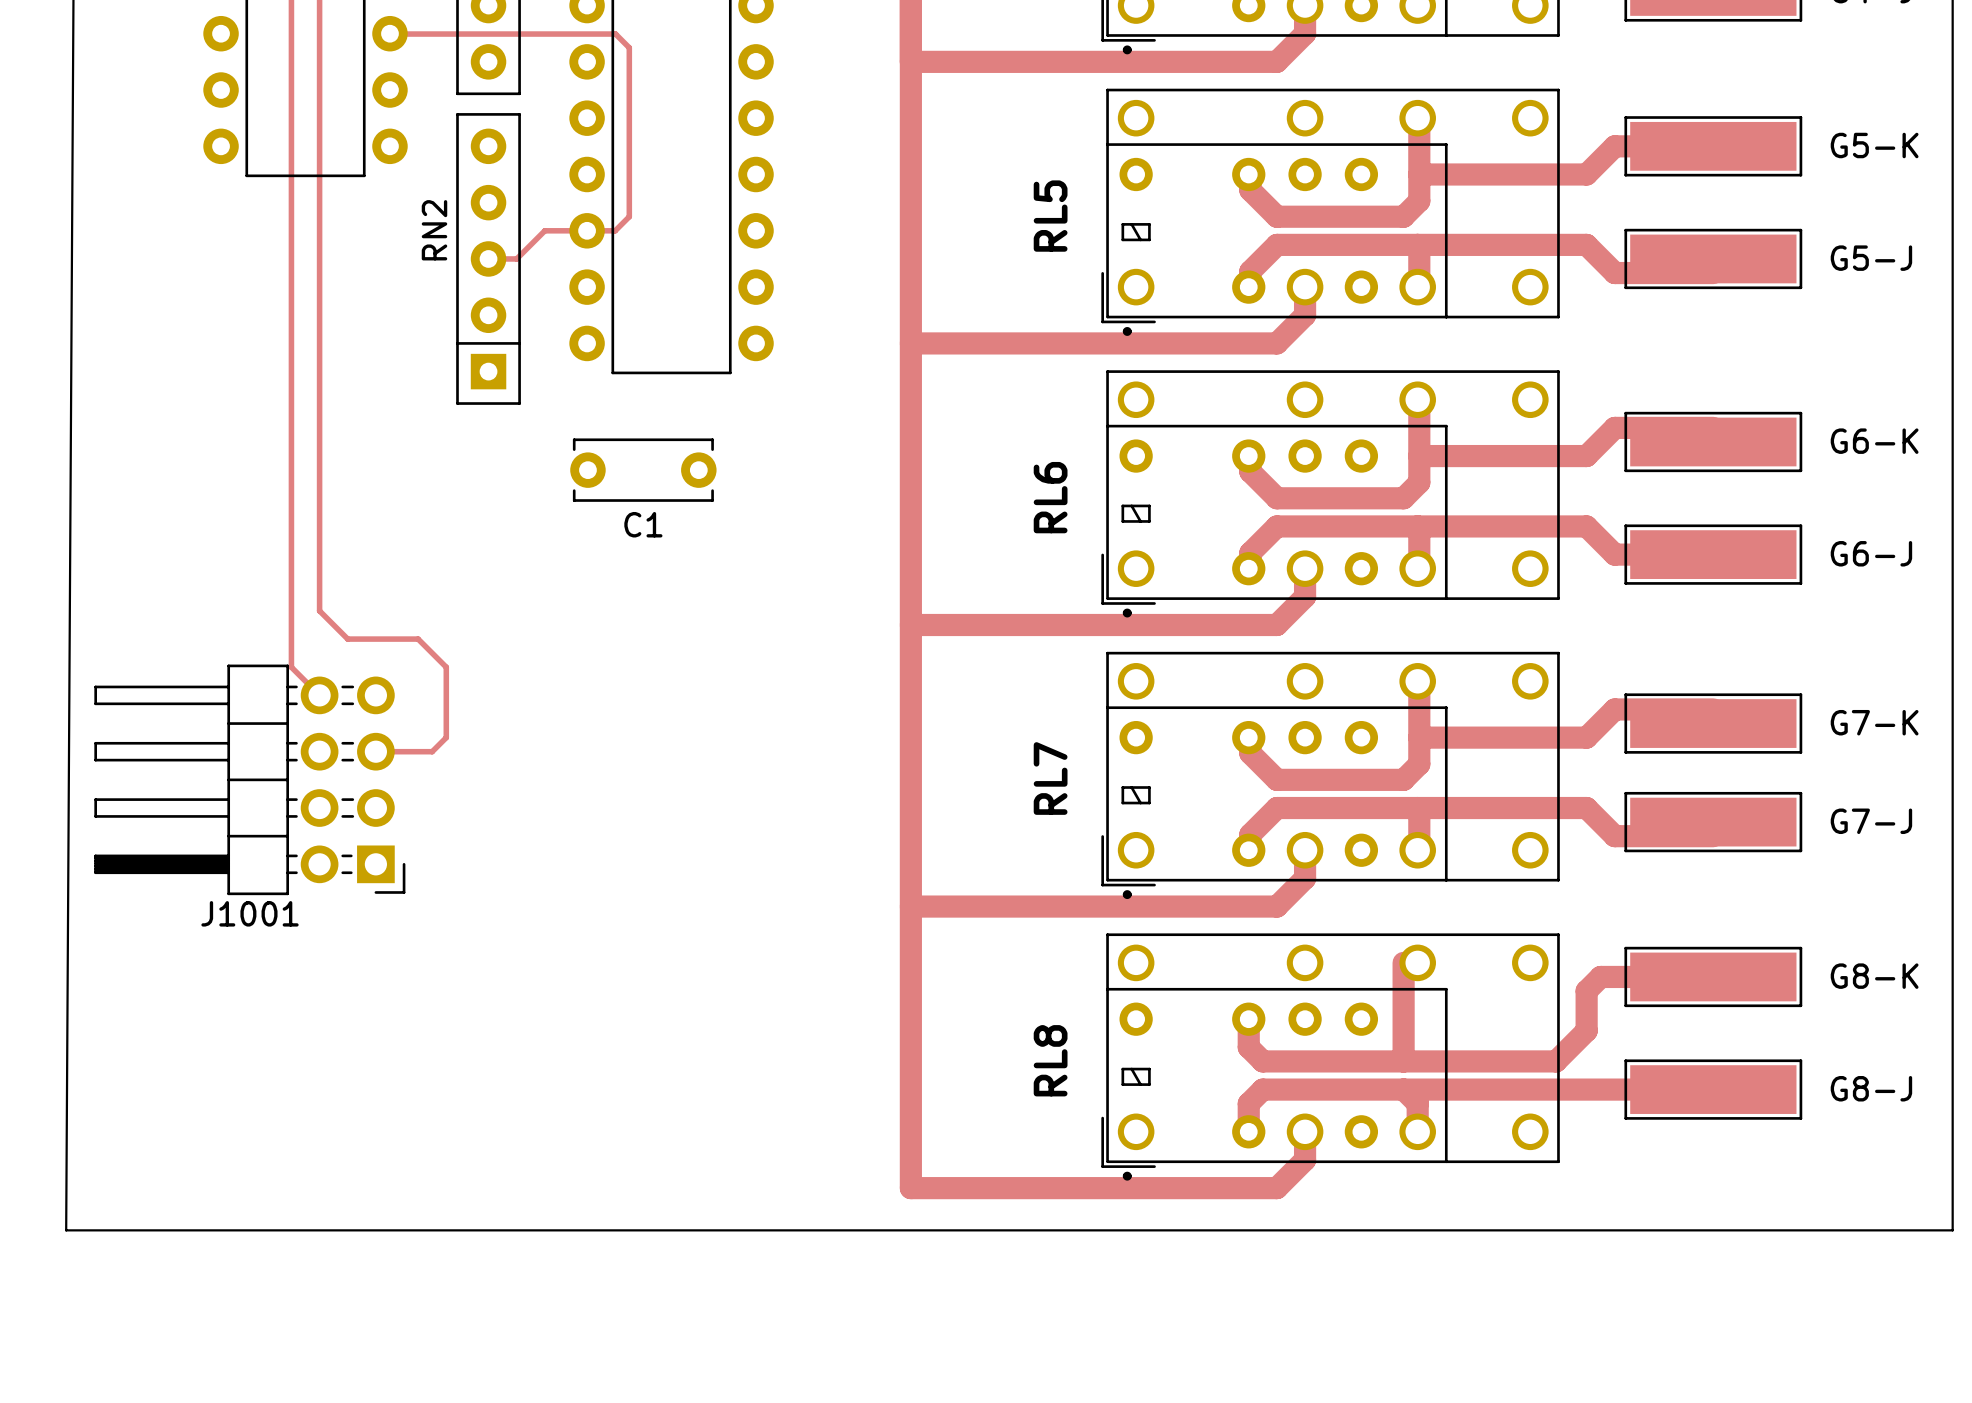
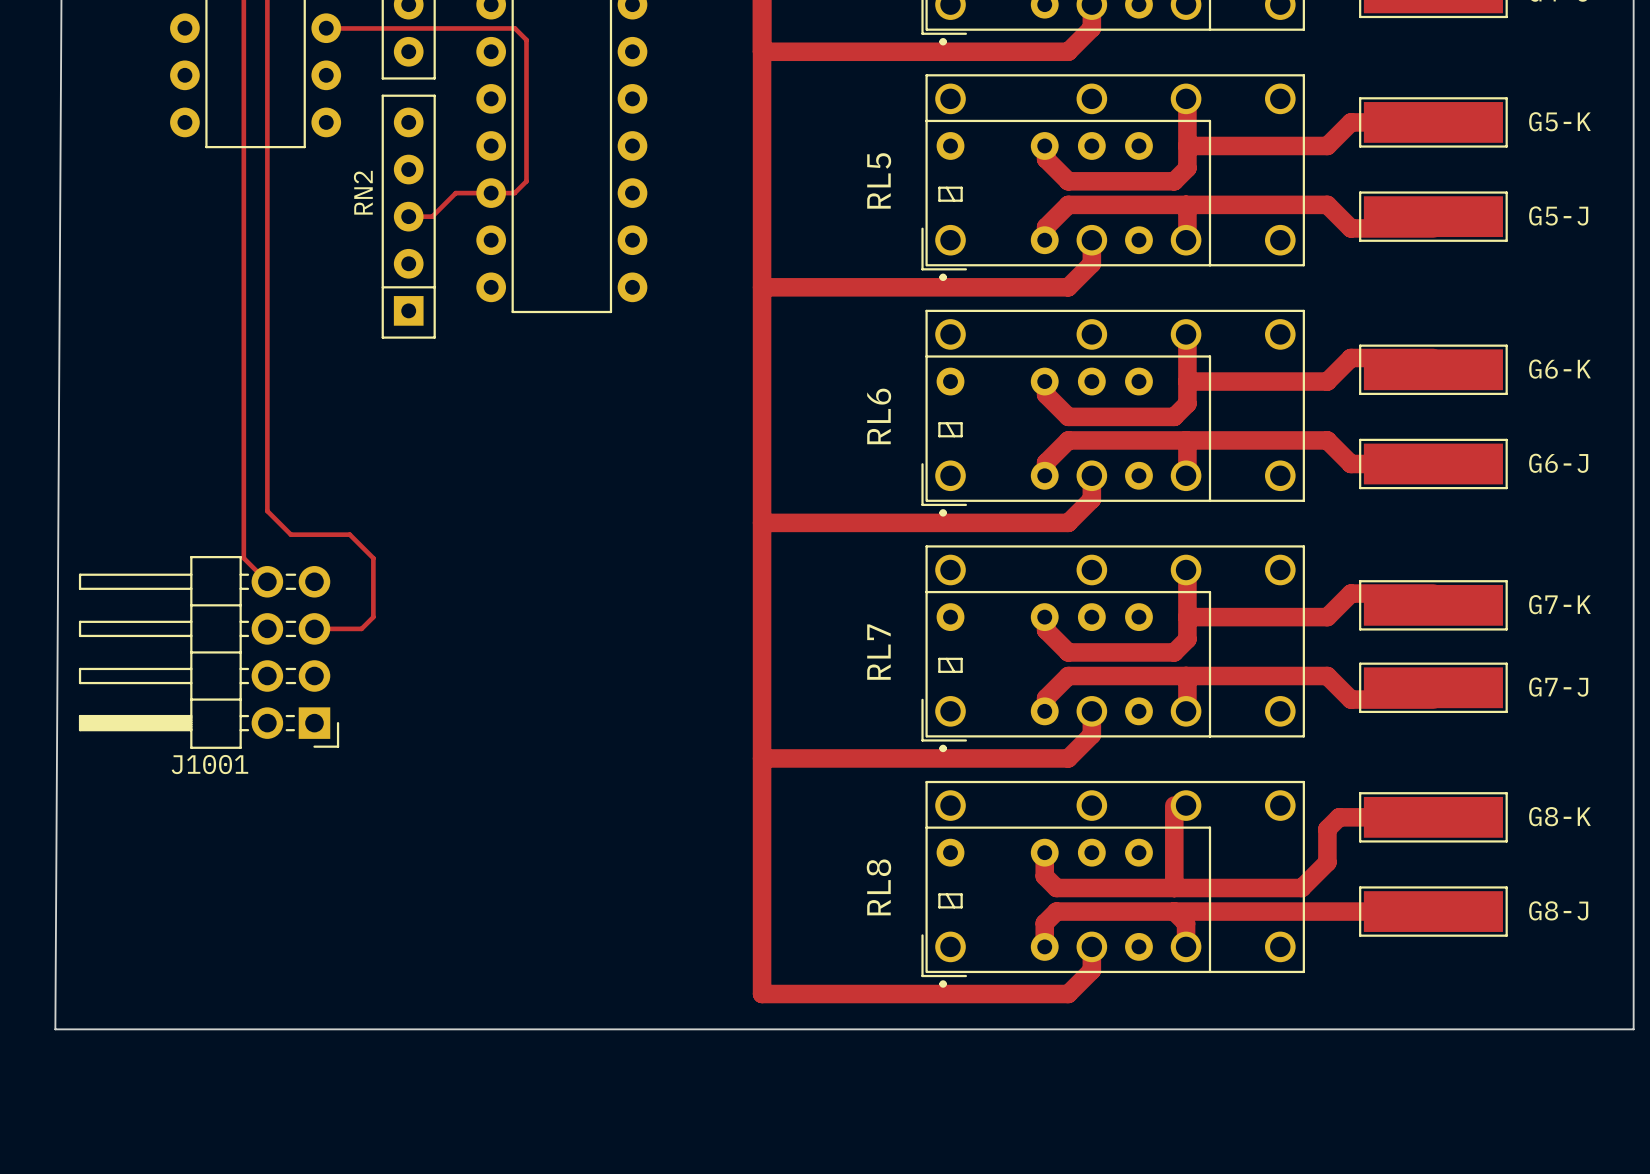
C1: (643, 470) -> none

